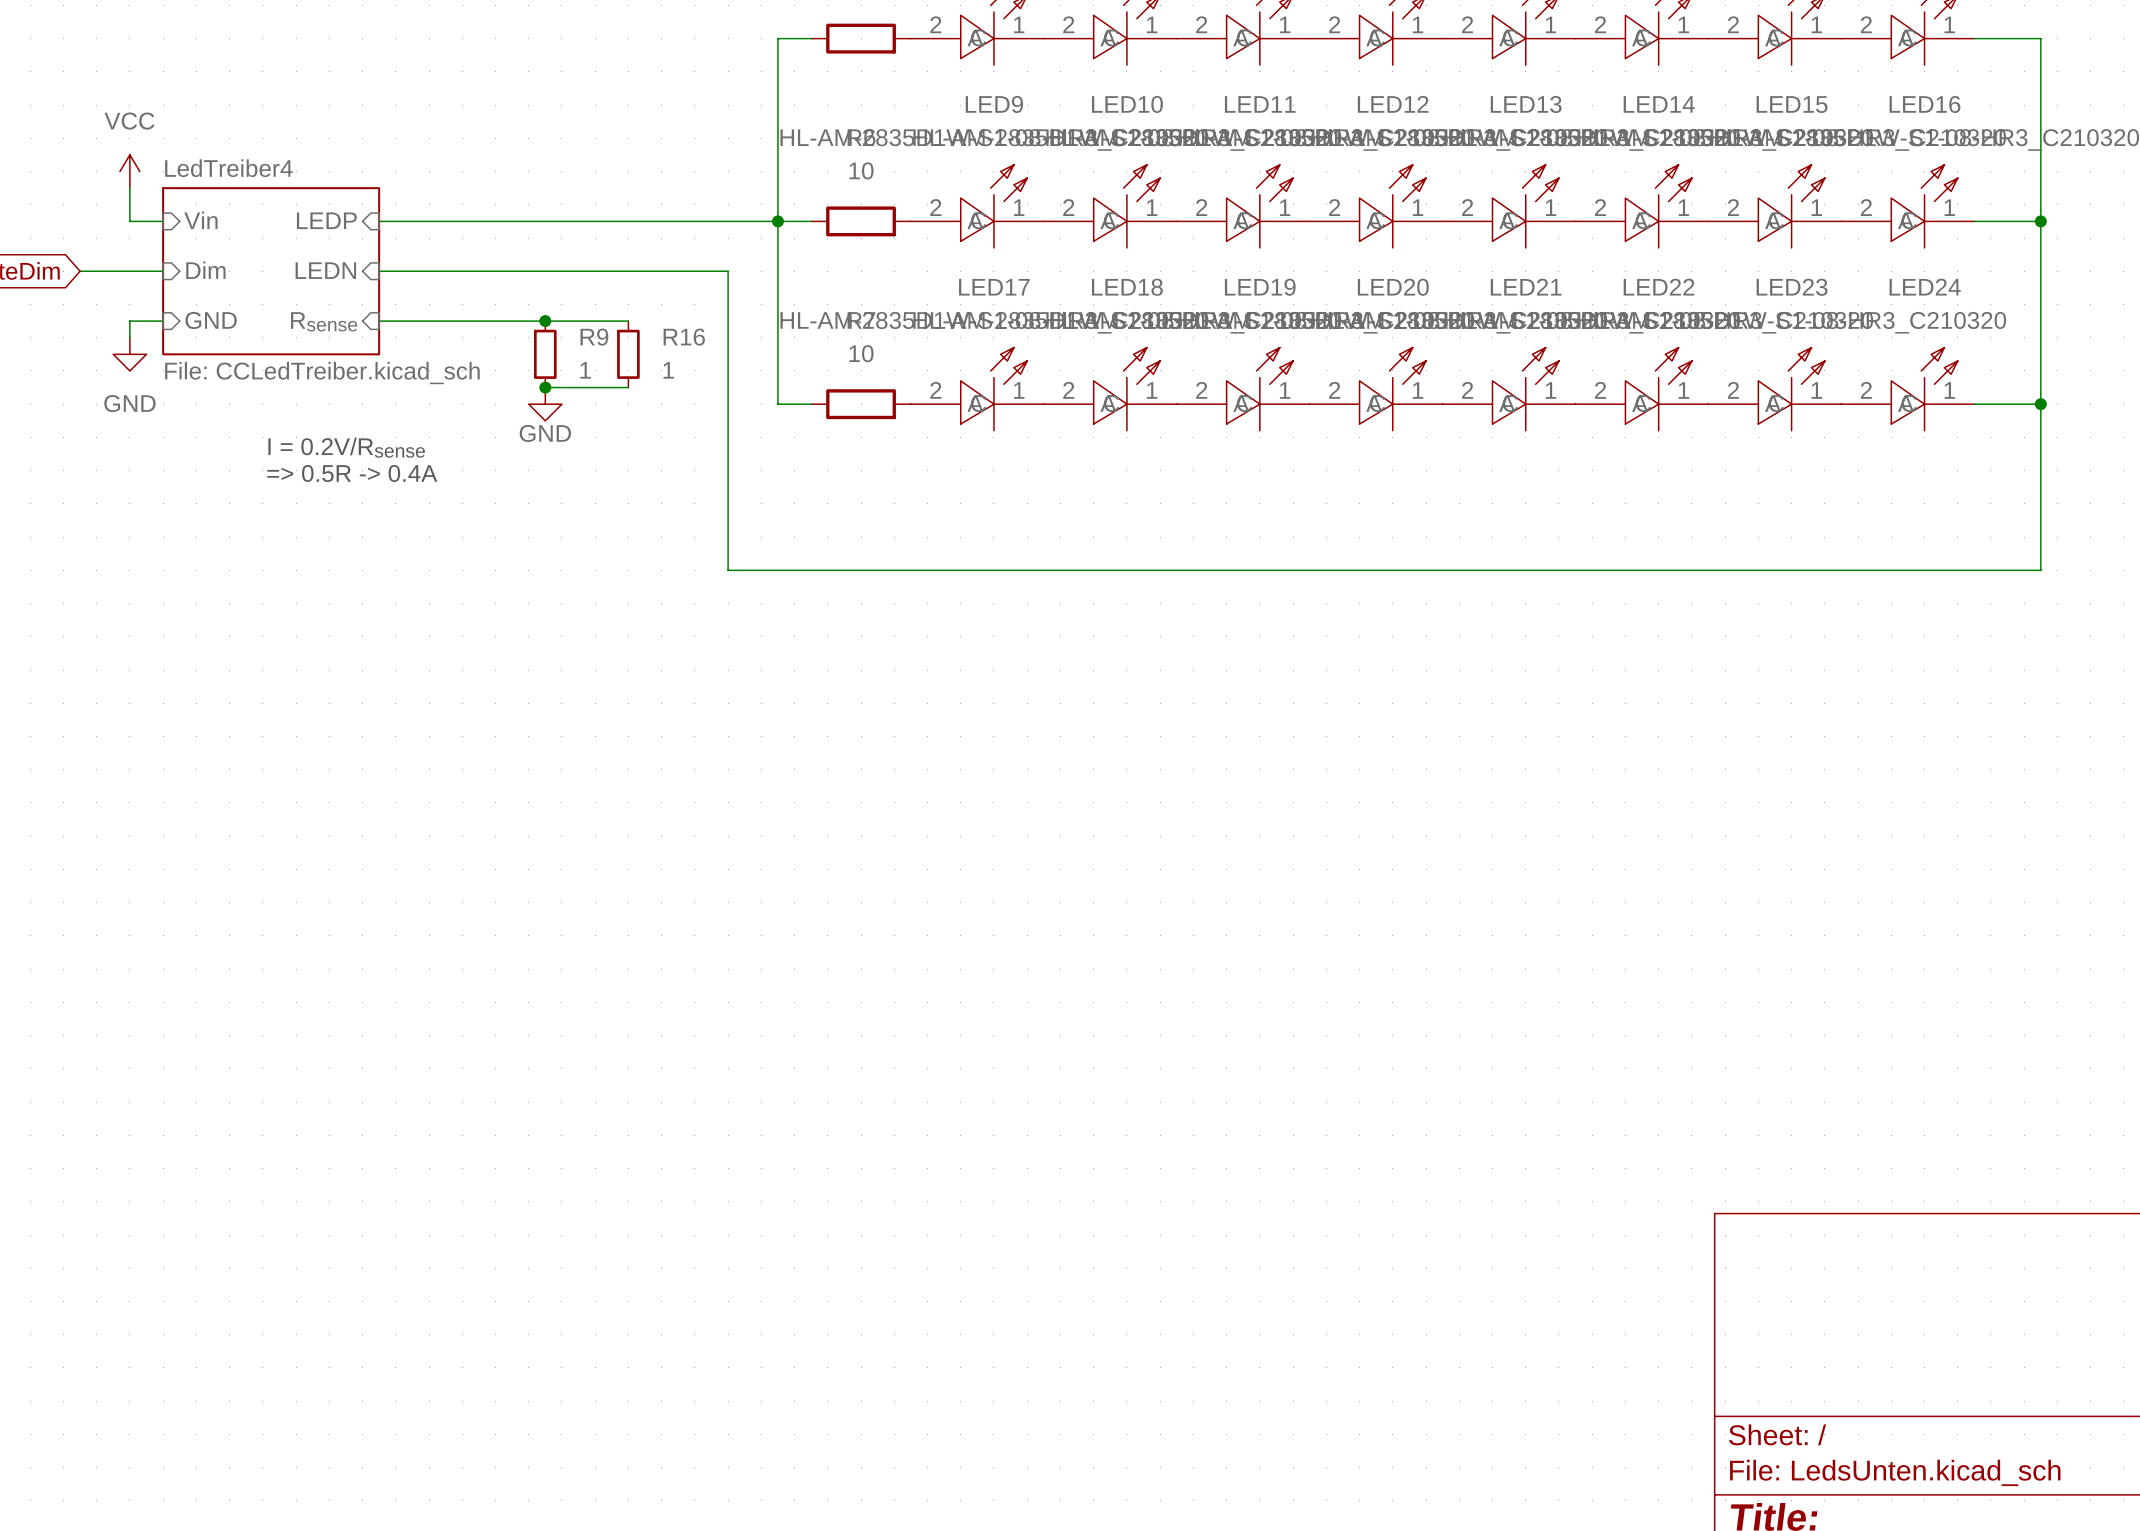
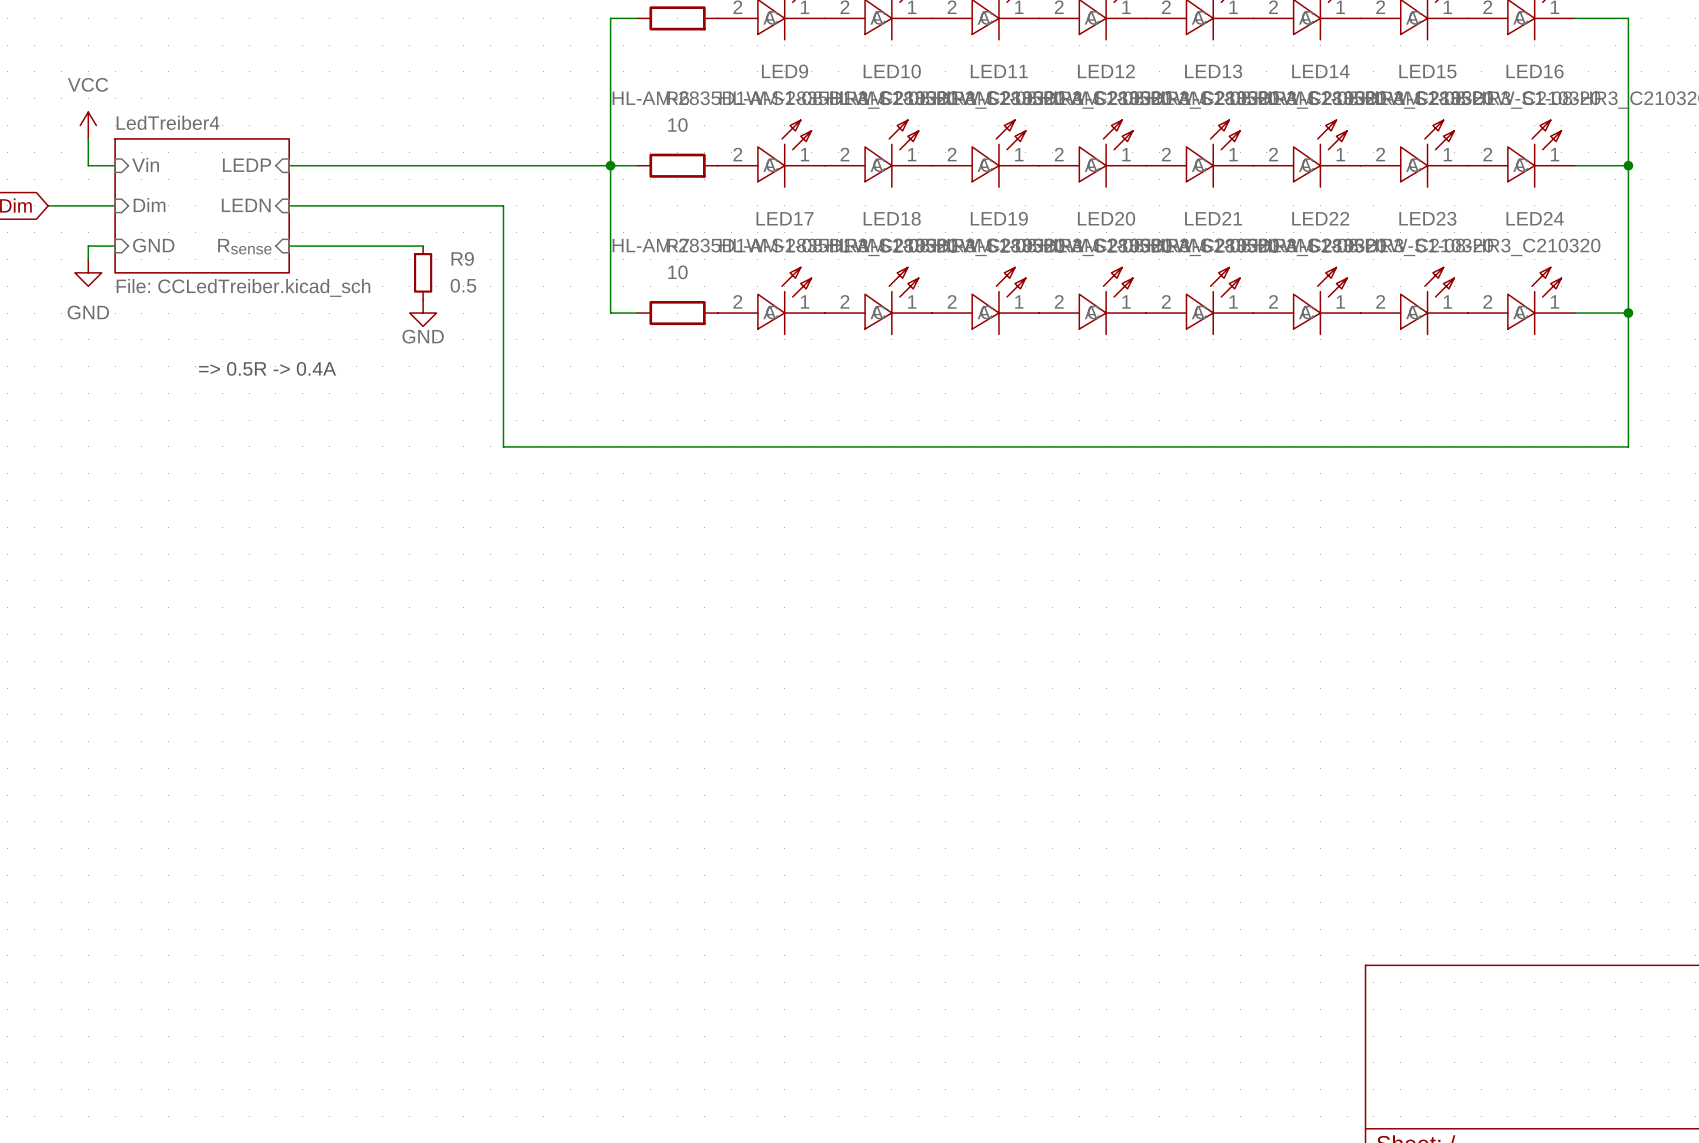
wire: (645, 271) (728, 271) (728, 570) -> (503, 205) (503, 446) (570, 446)
wire: (545, 321) (628, 321) -> none
junction: (545, 321) -> none
R16: 1 (628, 354) -> none
R9 value: 1 (585, 370) -> 0.5 (463, 285)
wire: (545, 387) (628, 387) -> none
junction: (545, 387) -> none
text: I = 0.2V/Rsense (346, 447) -> none

